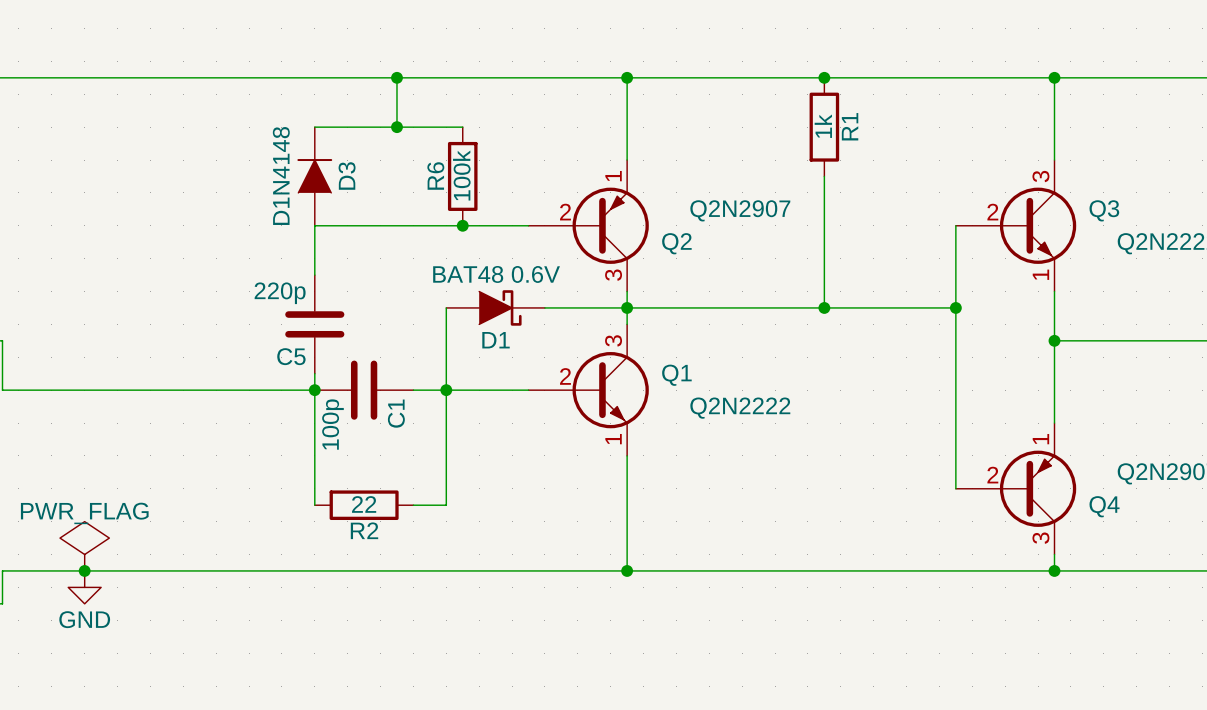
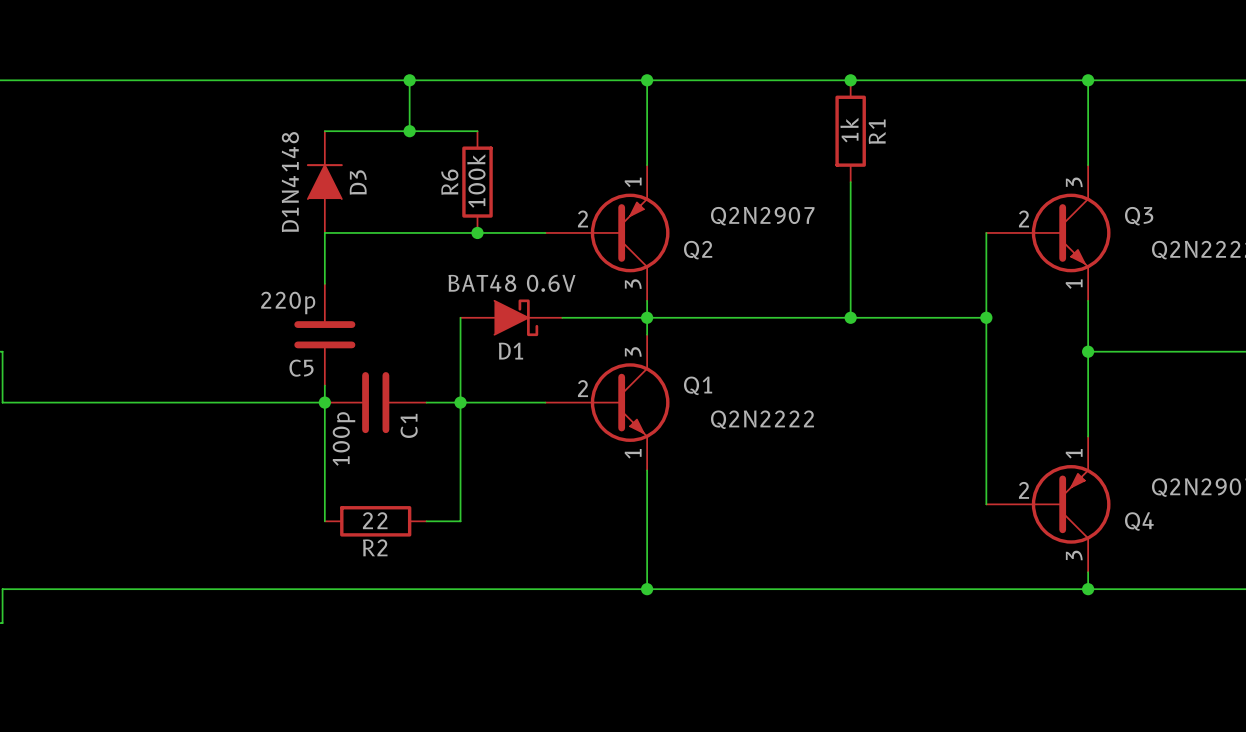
power symbol: PWR_FLAG (84, 546) -> none
junction: (84, 570) -> none
power symbol: GND (84, 587) -> none

